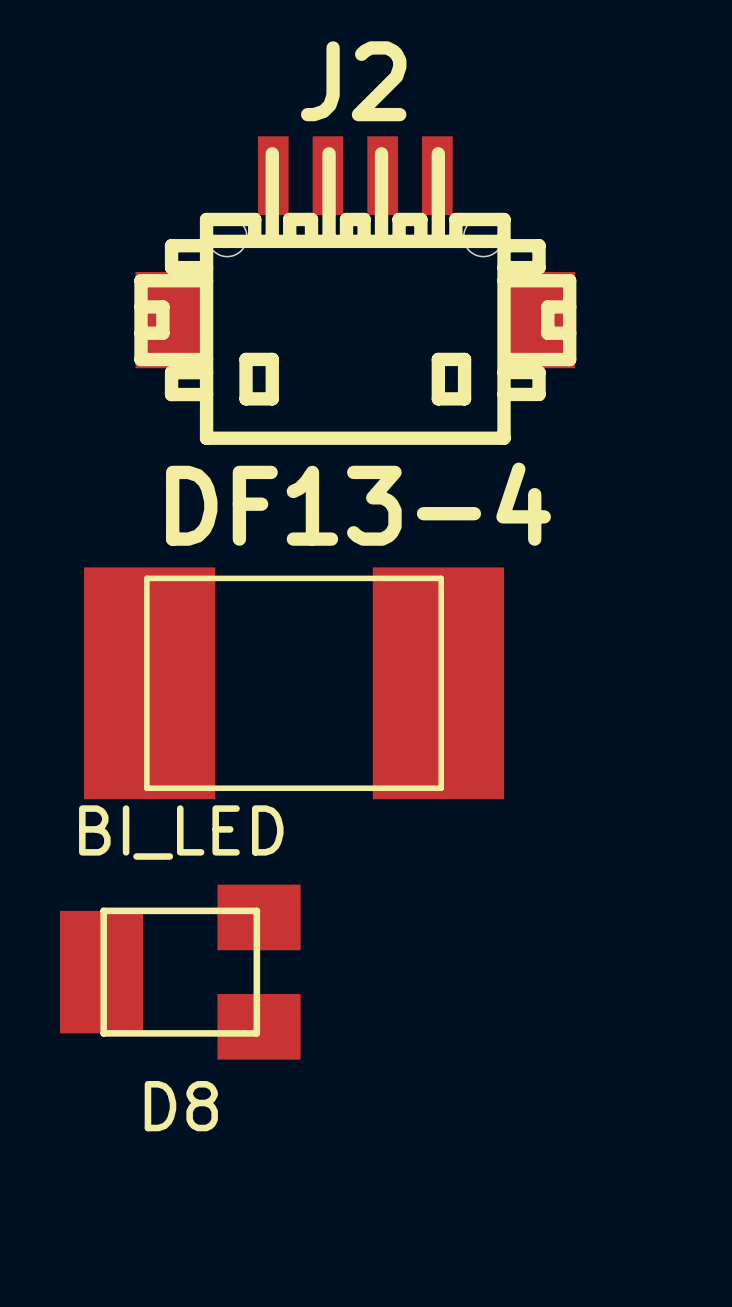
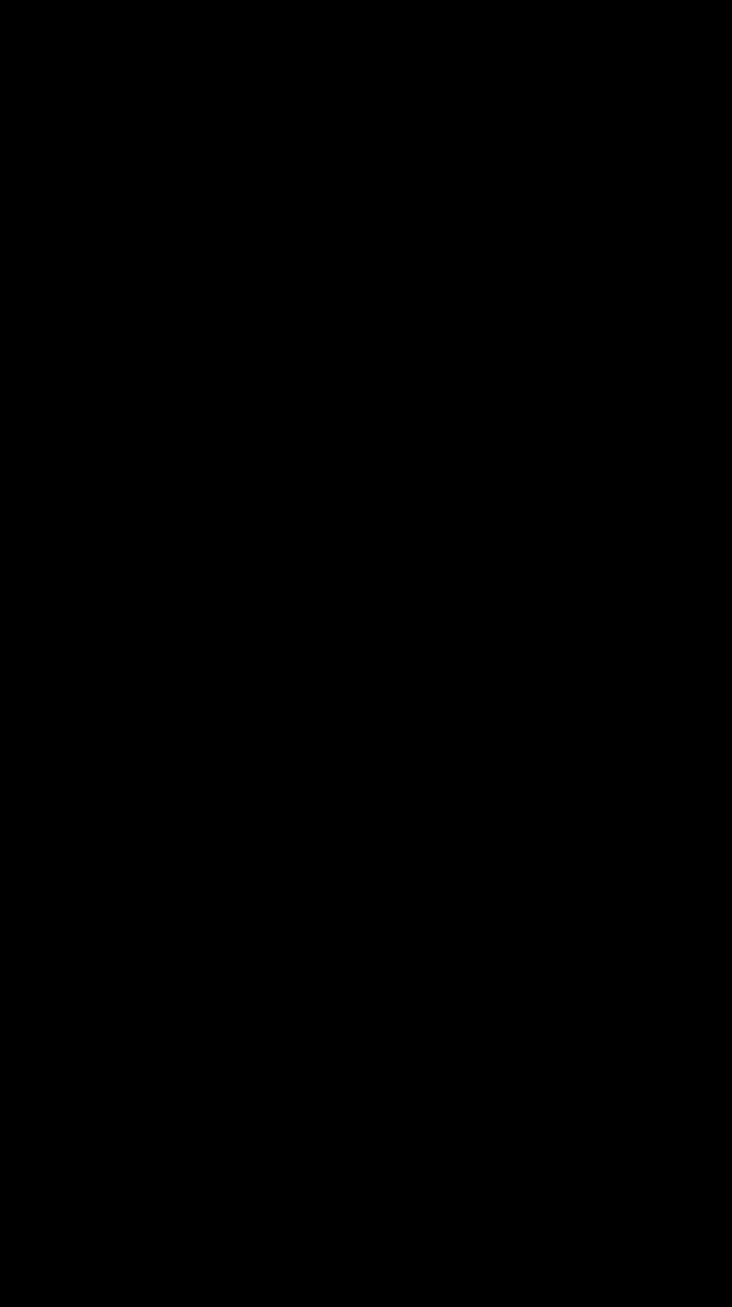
J2: DF13-4 (355, 290) -> none
part: (294, 683) -> none
D8: BI_LED (180, 972) -> none

